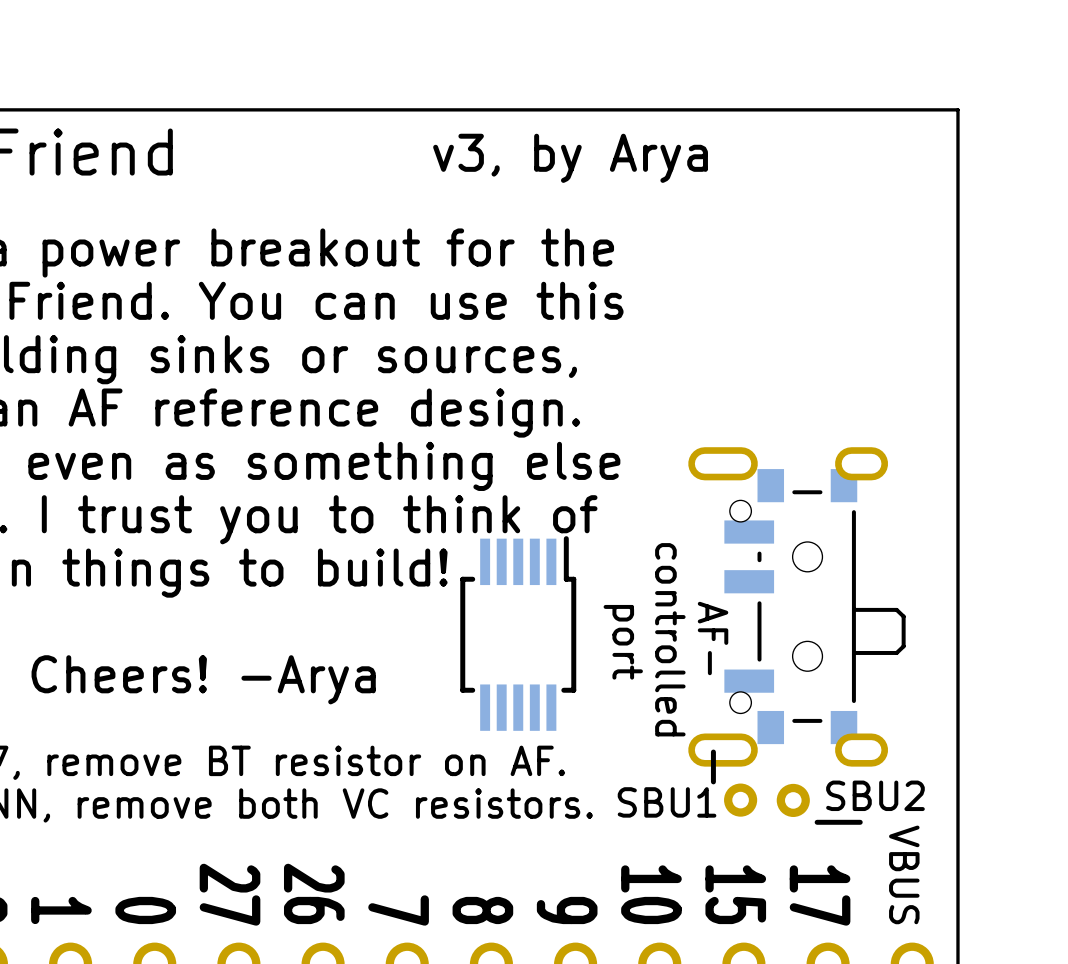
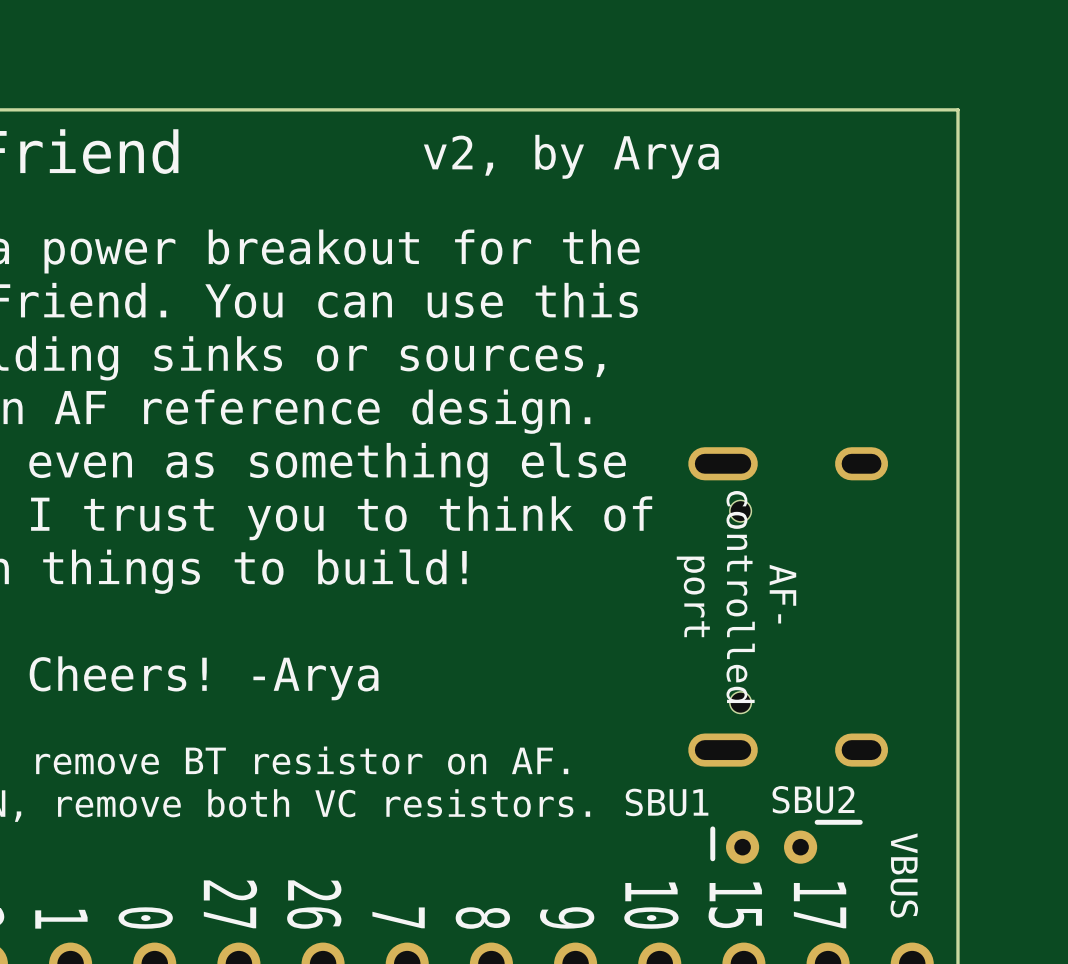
text: v3, by Arya (570, 158) -> v2, by Arya (571, 156)
part: (815, 606) -> none
part: (518, 633) -> none
text position: AF- (713, 638) -> AF- (782, 594)
text position: controlled (670, 639) -> controlled (740, 597)
text position: port (623, 642) -> port (693, 596)
line: (713, 752) (713, 781) -> (712, 828) (712, 858)
part value position: SBU2 (875, 795) -> SBU2 (813, 799)
part position: (740, 800) -> (742, 847)
part position: (793, 800) -> (800, 847)

